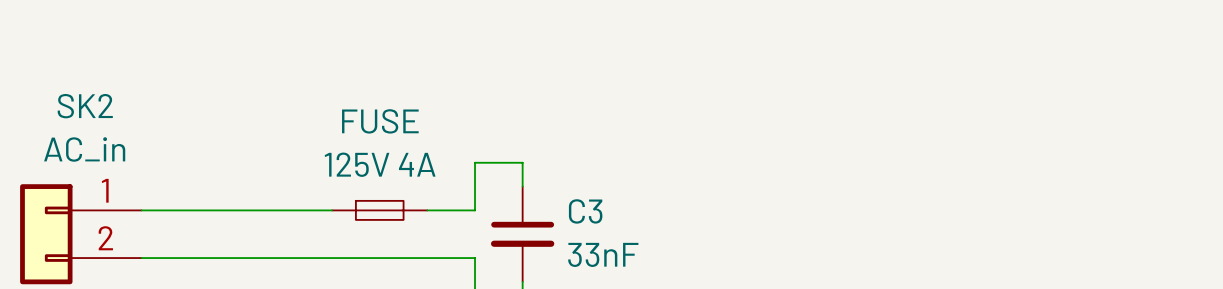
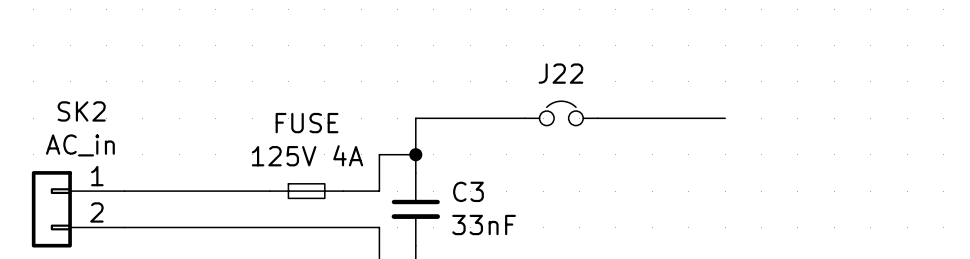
J22: none -> (561, 113)
wire: none -> (524, 118) (415, 118) (415, 154)
wire: none -> (597, 118) (725, 118)
junction: none -> (415, 154)

